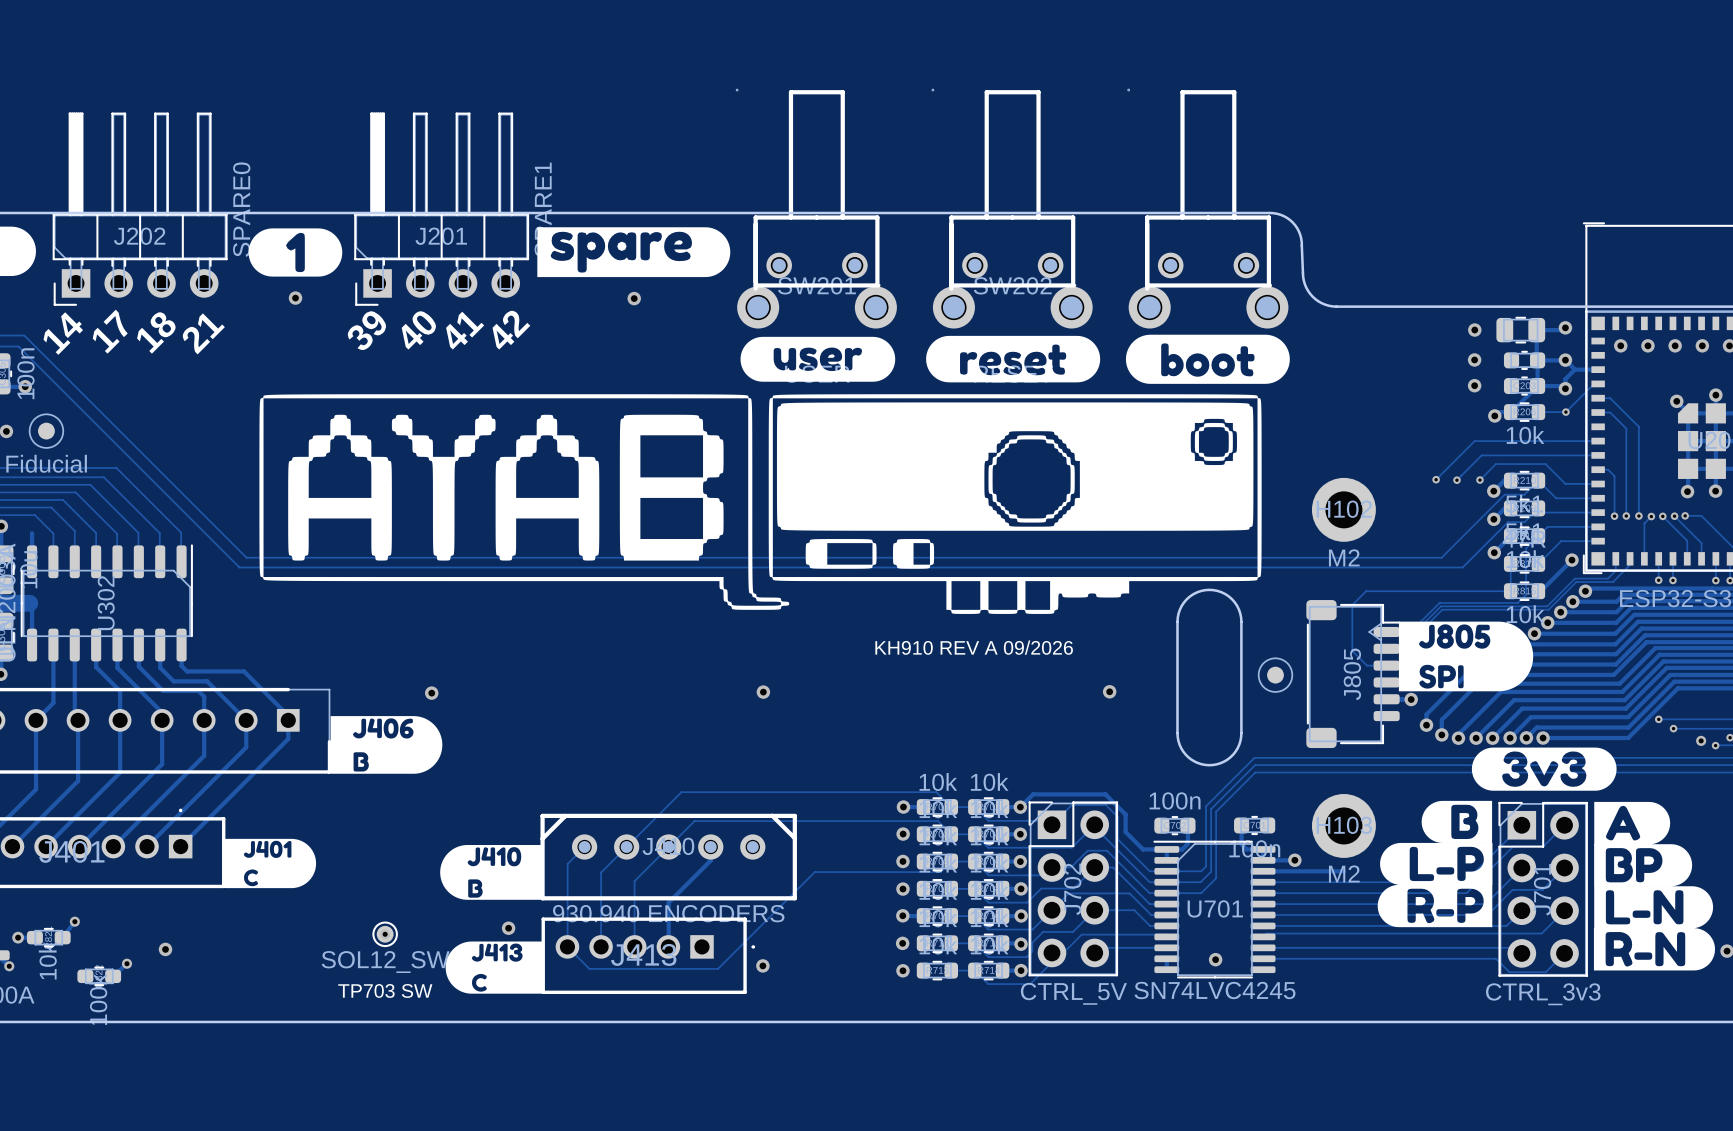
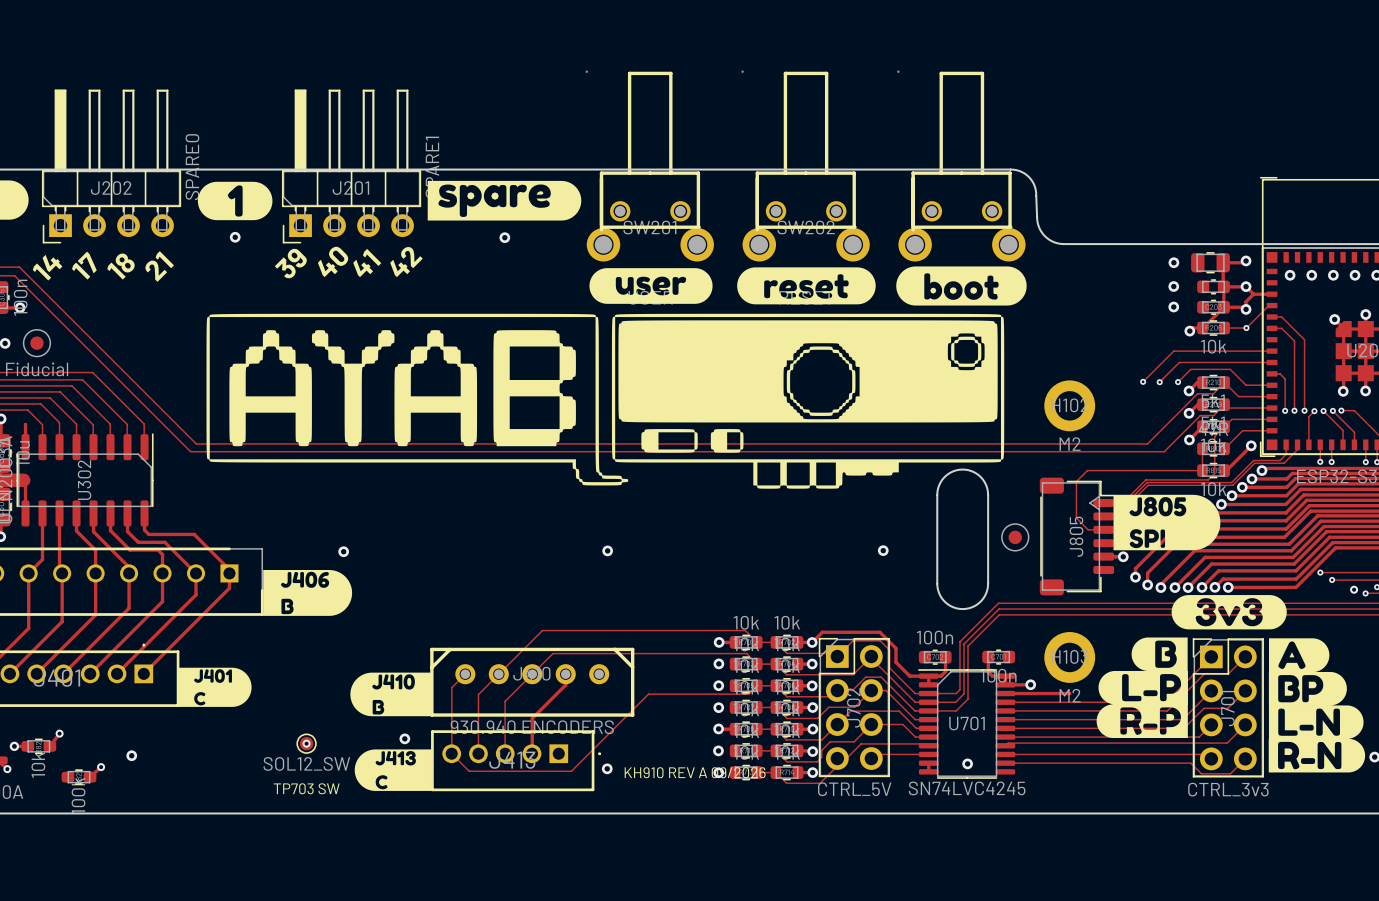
text position: KH910 REV A 09/2026 (974, 647) -> KH910 REV A 09/2026 (695, 772)

